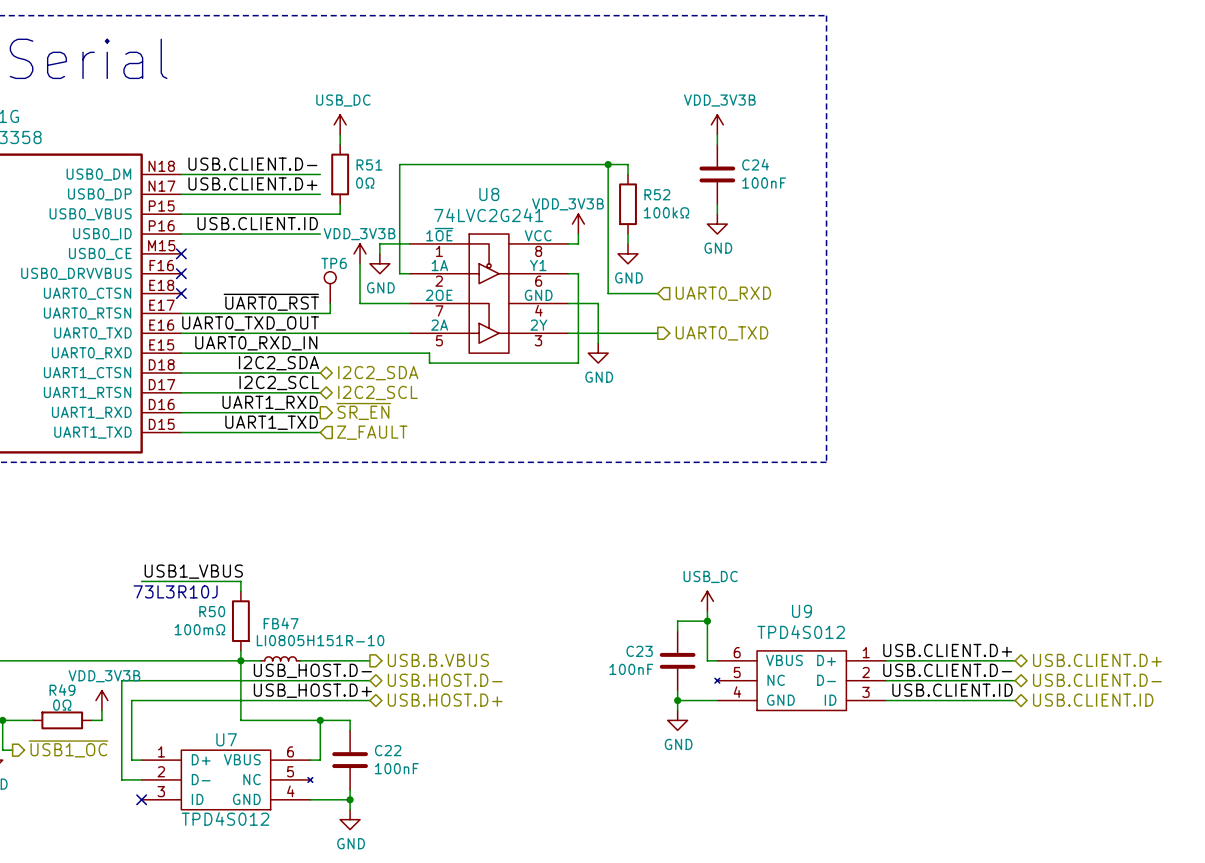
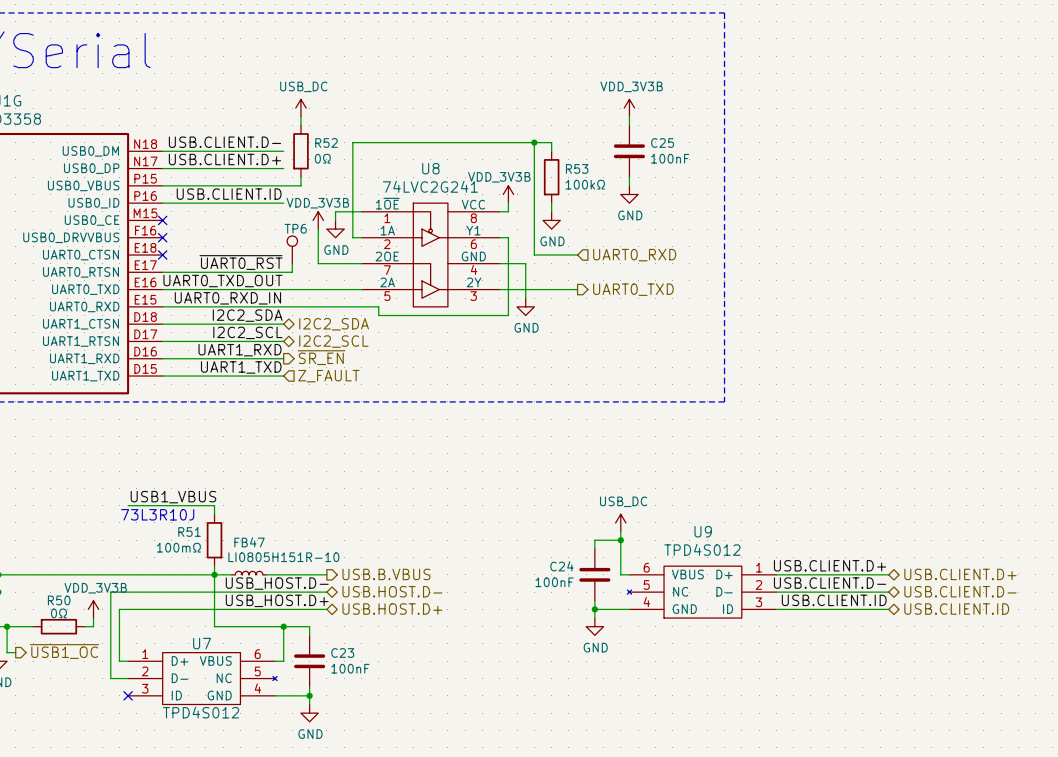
R51 name: R51 (369, 164) -> R52 (326, 143)
C24 name: C24 (755, 164) -> C25 (662, 143)
R52 name: R52 (657, 194) -> R53 (577, 168)
R50 name: R50 (212, 611) -> R51 (189, 531)
C23 name: C23 (639, 651) -> C24 (561, 566)
R49 name: R49 (62, 690) -> R50 (59, 600)
C22 name: C22 (388, 750) -> C23 (342, 652)

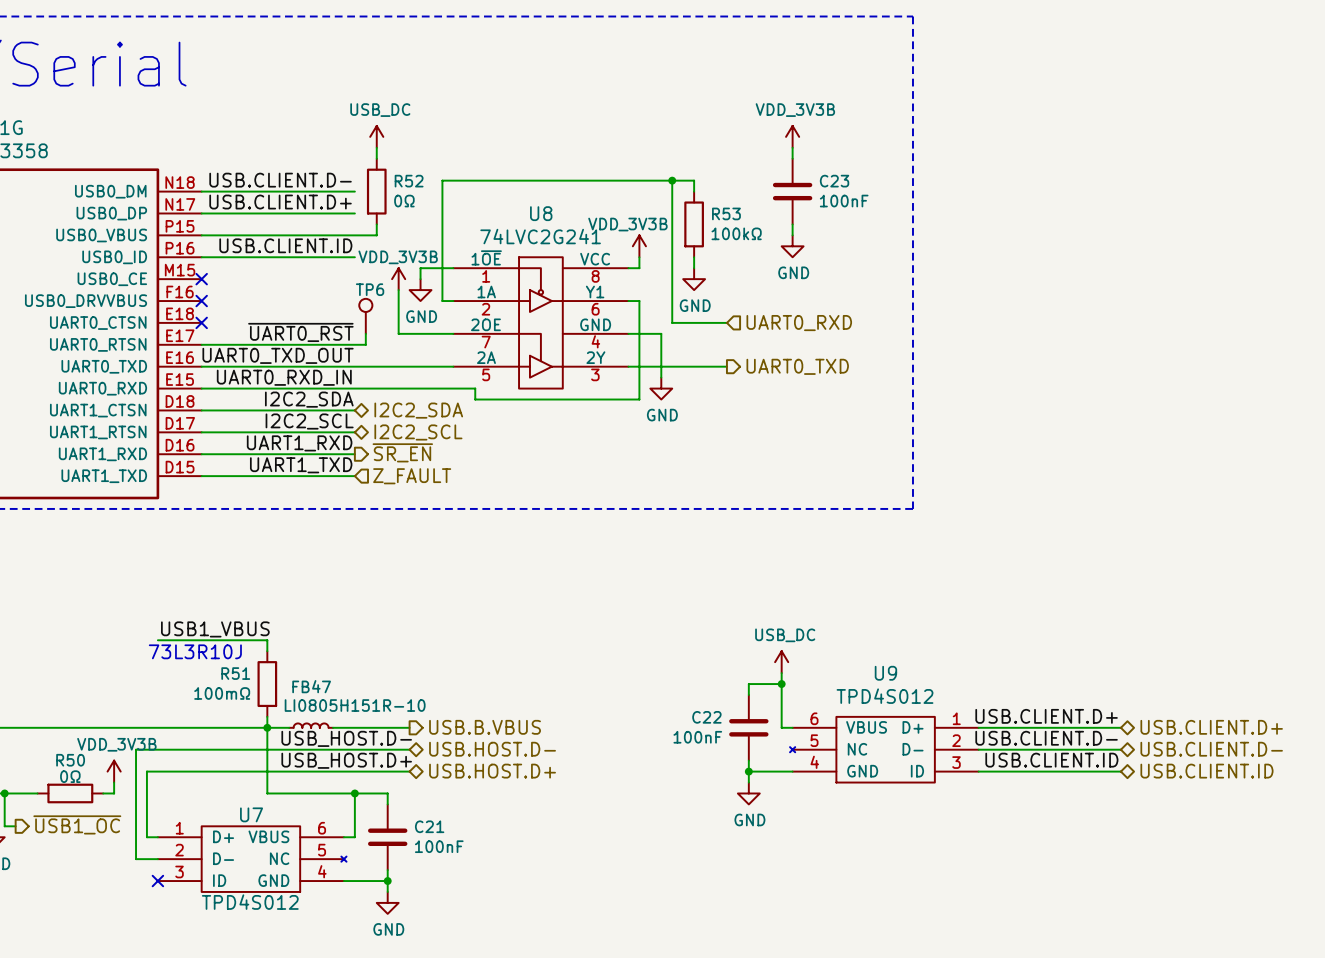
C25 name: C25 (662, 143) -> C23 (834, 181)
C24 name: C24 (561, 566) -> C22 (706, 717)
C23 name: C23 (342, 652) -> C21 (429, 826)

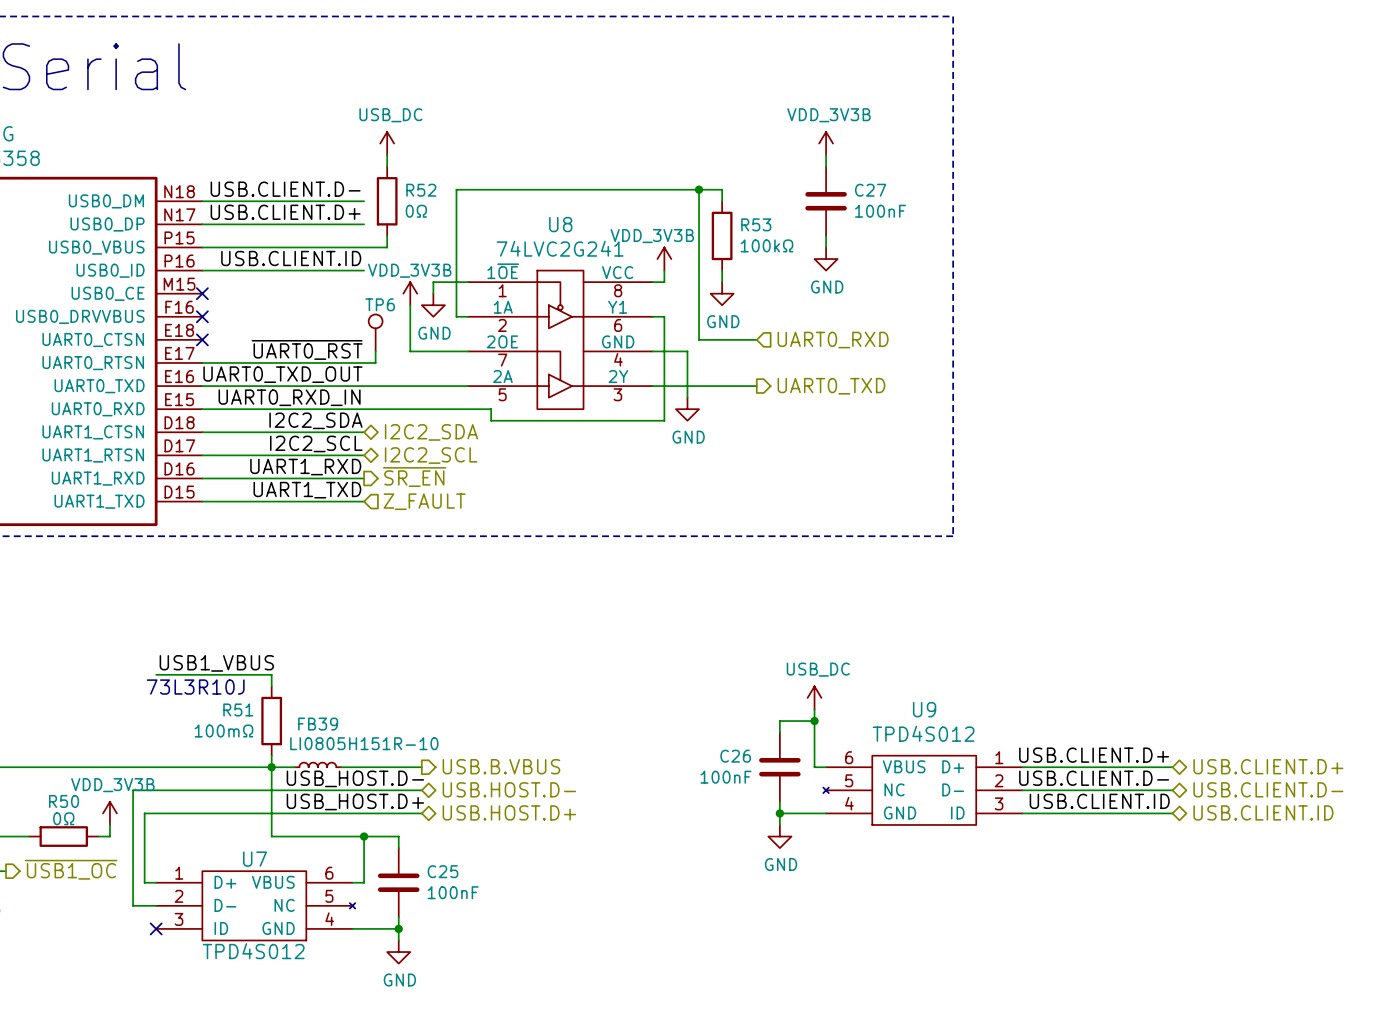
C23 name: C23 (834, 181) -> C27 (870, 190)
FB47 name: FB47 (311, 686) -> FB39 (318, 724)
C22 name: C22 (706, 717) -> C26 (735, 756)
C21 name: C21 (429, 826) -> C25 (442, 871)

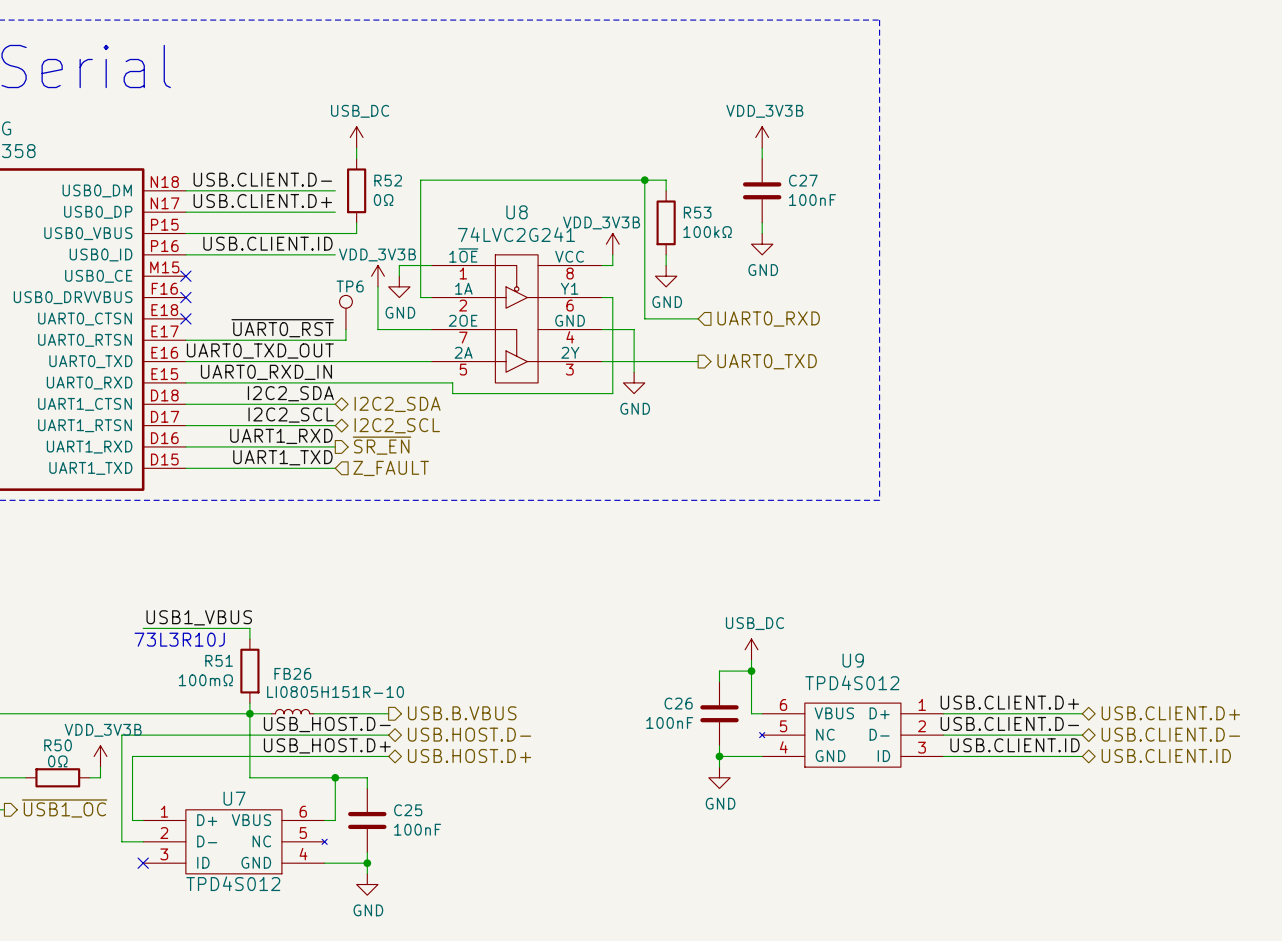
FB39 name: FB39 (318, 724) -> FB26 (292, 673)

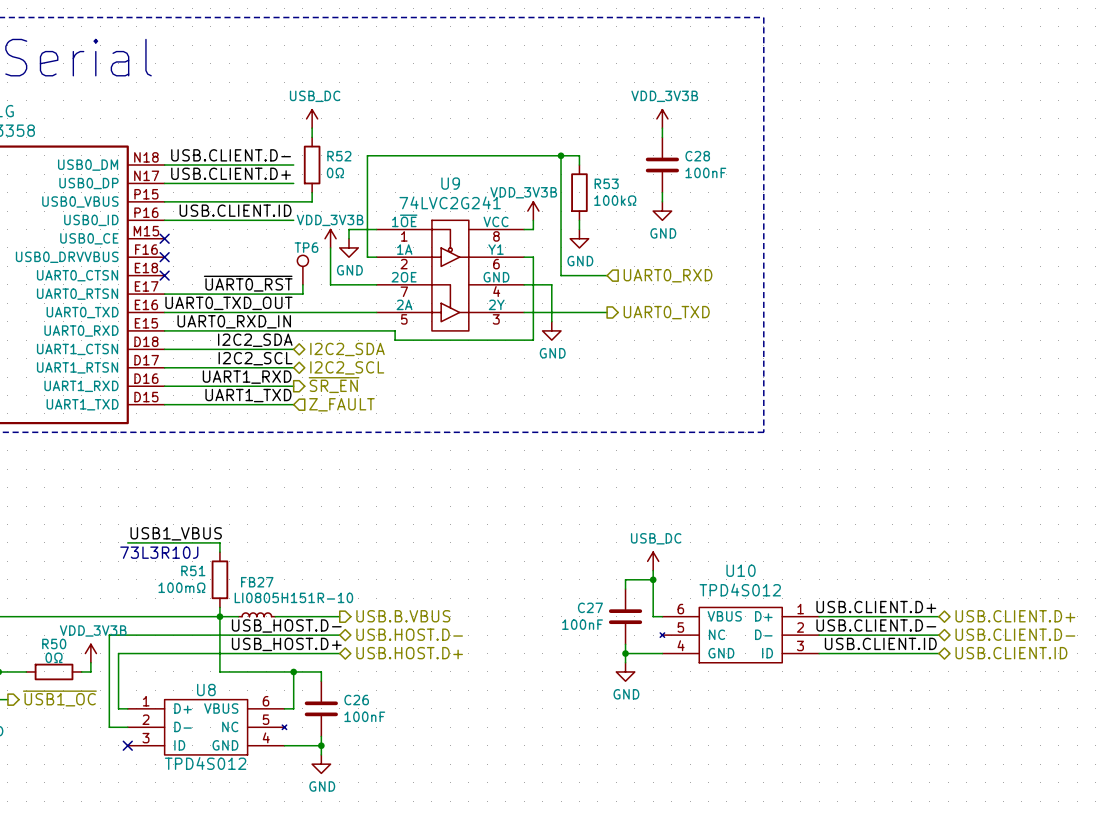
C27 name: C27 (803, 180) -> C28 (697, 156)
U8 name: U8 (517, 212) -> U9 (450, 183)
U9 name: U9 (853, 660) -> U10 (741, 570)
FB26 name: FB26 (292, 673) -> FB27 (257, 582)
C26 name: C26 (678, 703) -> C27 (590, 607)
U7 name: U7 (234, 798) -> U8 (206, 690)
C25 name: C25 (408, 810) -> C26 (356, 700)

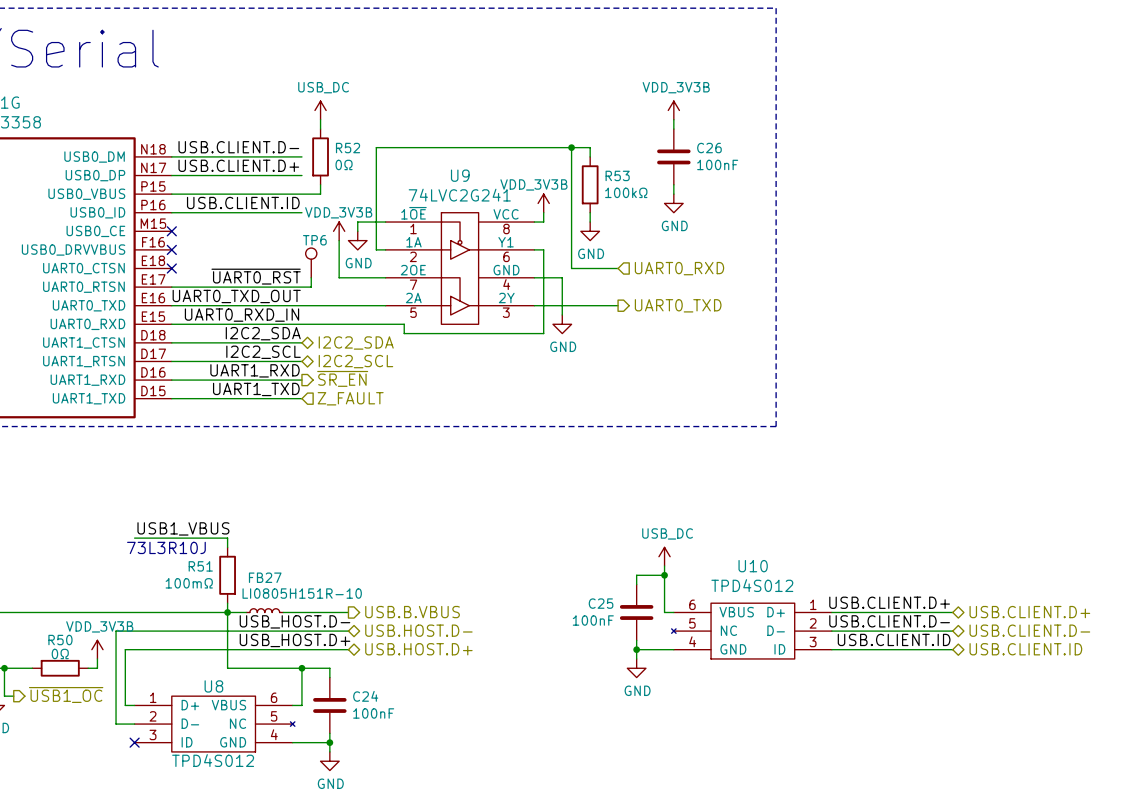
C28 name: C28 (697, 156) -> C26 (709, 148)
C27 name: C27 (590, 607) -> C25 (601, 603)
C26 name: C26 (356, 700) -> C24 (365, 696)

